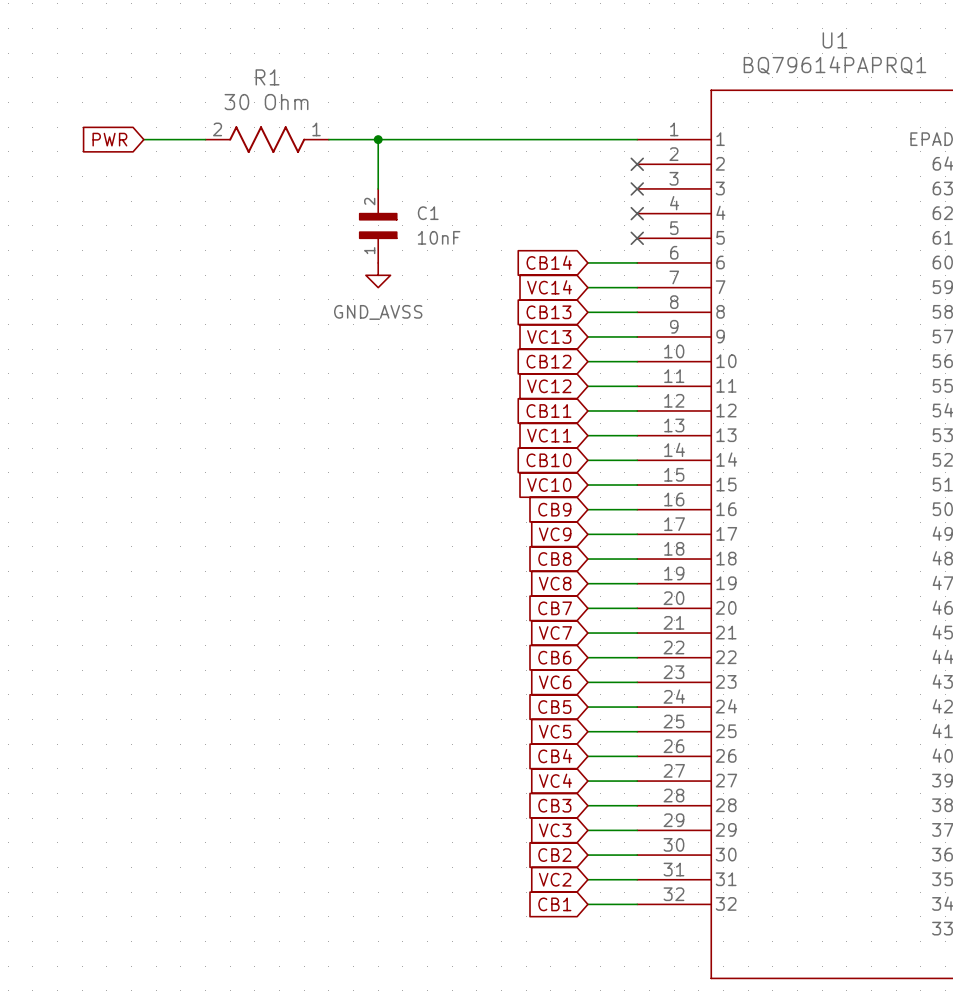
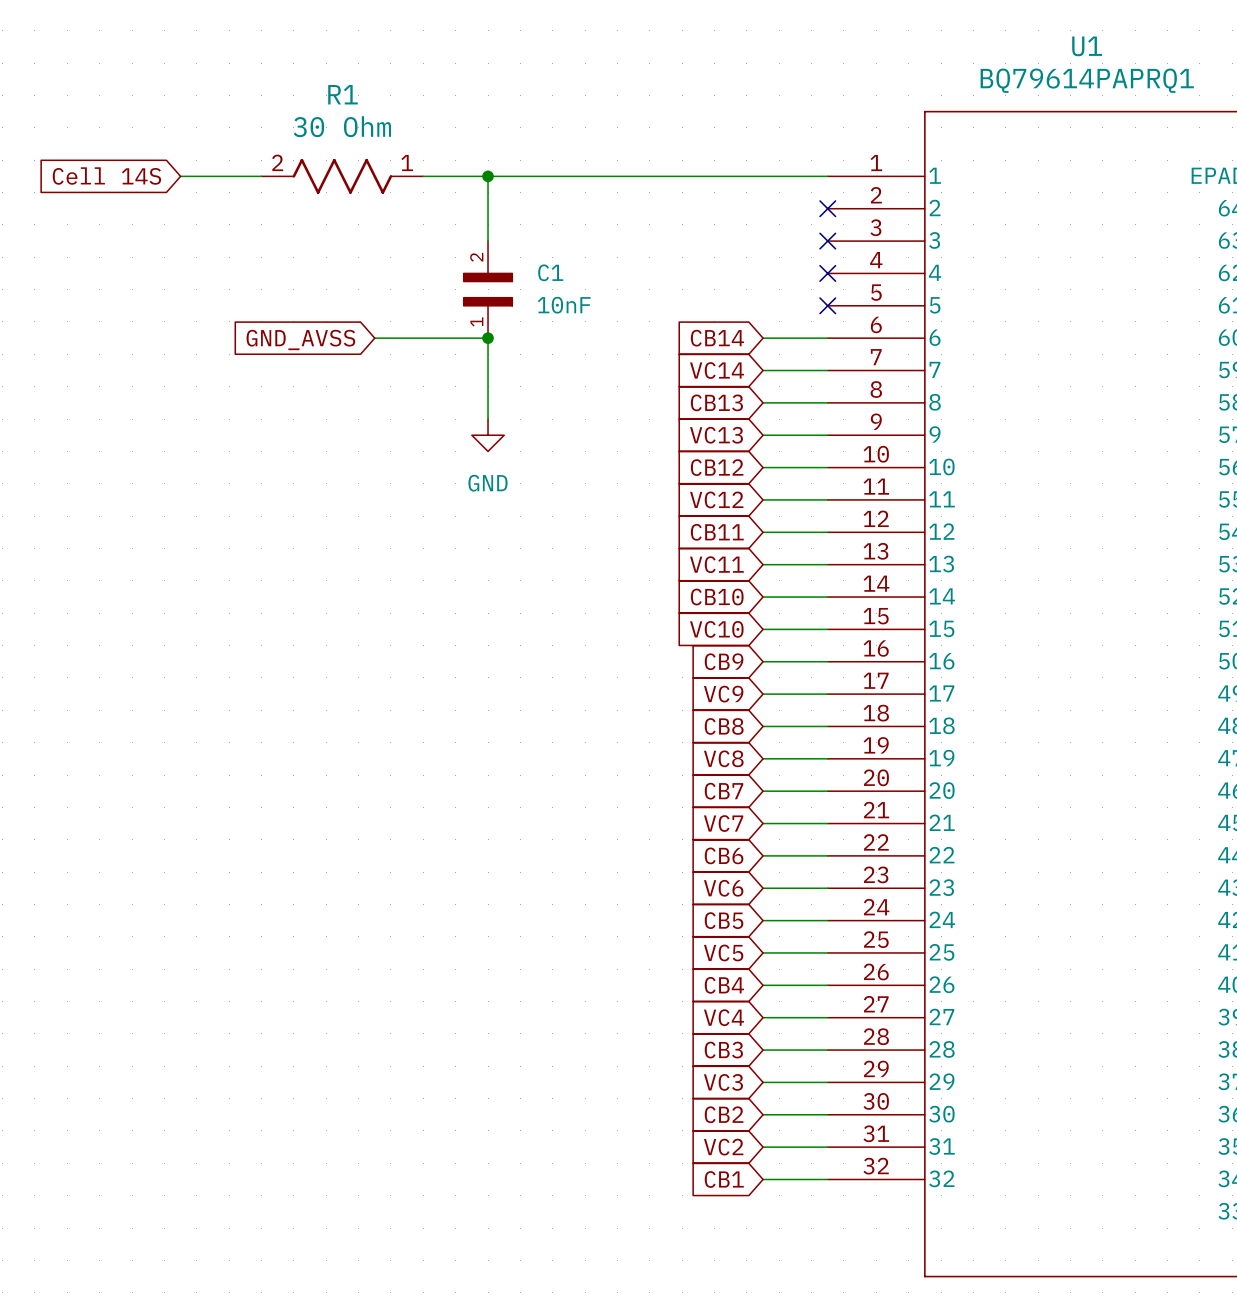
global label: PWR (109, 139) -> Cell 14S (106, 176)
wire: none -> (374, 338) (488, 338) (488, 419)
junction: none -> (488, 338)
global label: none -> GND_AVSS (300, 339)
power symbol: GND_AVSS (378, 275) -> none
power symbol: none -> GND (488, 435)

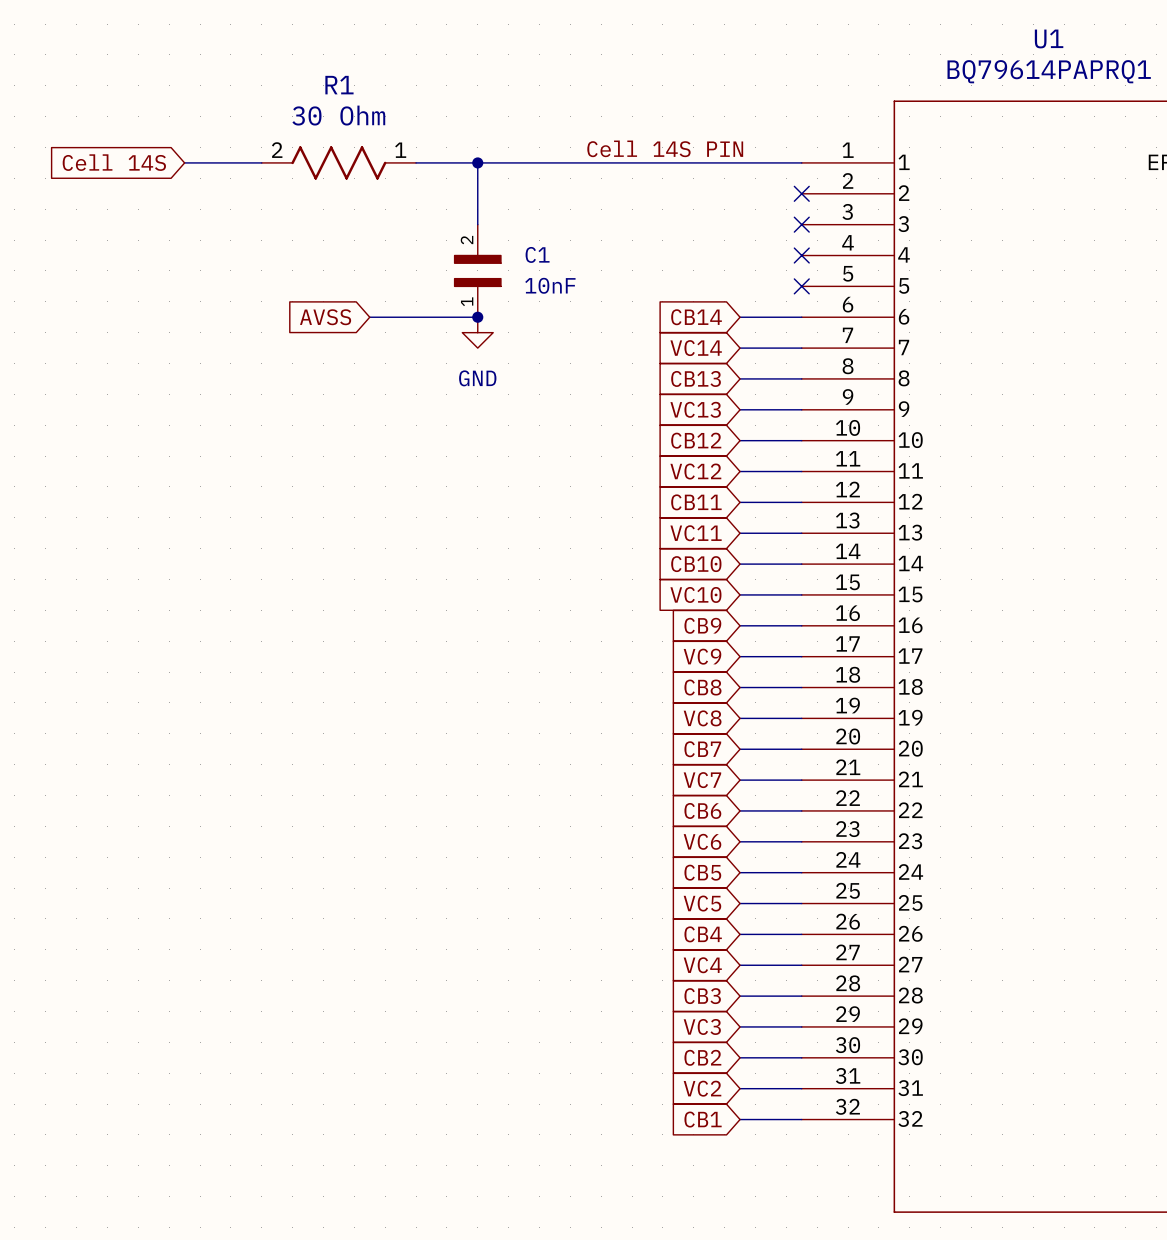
label: none -> Cell 14S PIN (665, 148)
wire: (488, 338) (488, 419) -> none
global label: GND_AVSS (300, 339) -> AVSS (325, 317)
power symbol position: GND (488, 435) -> GND (477, 332)

